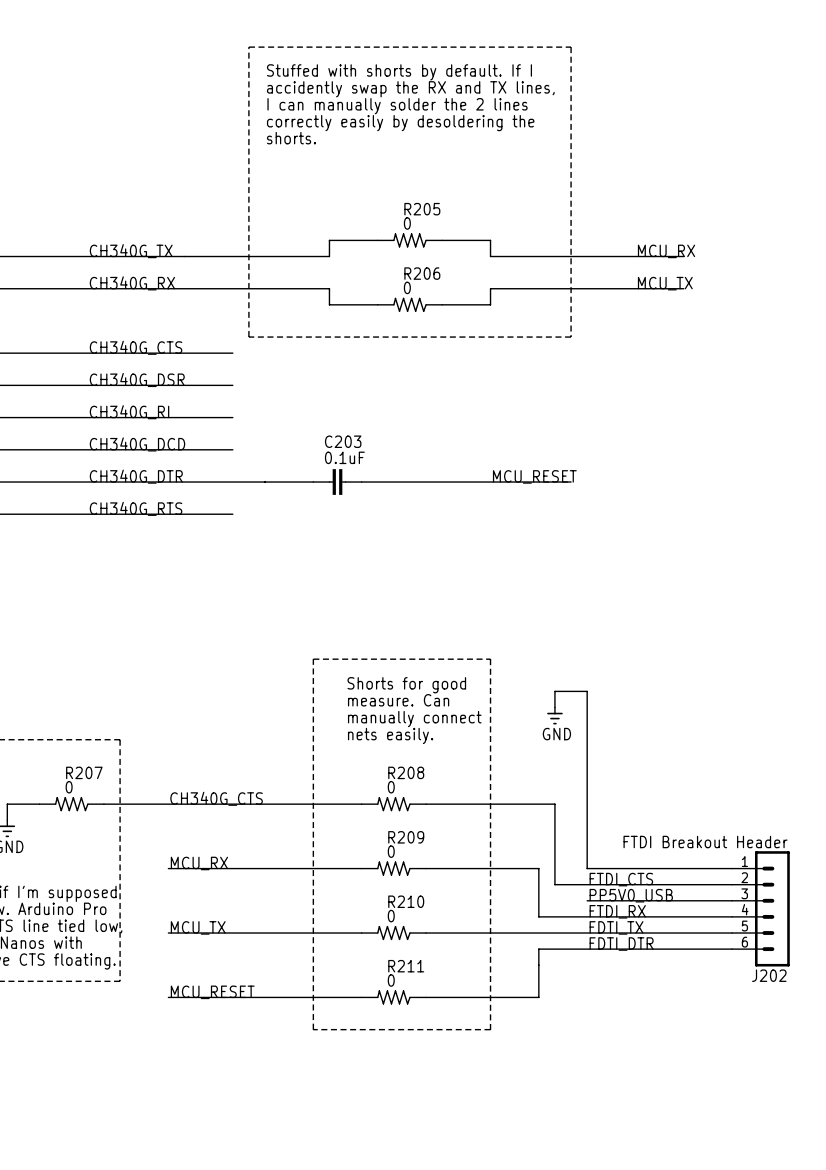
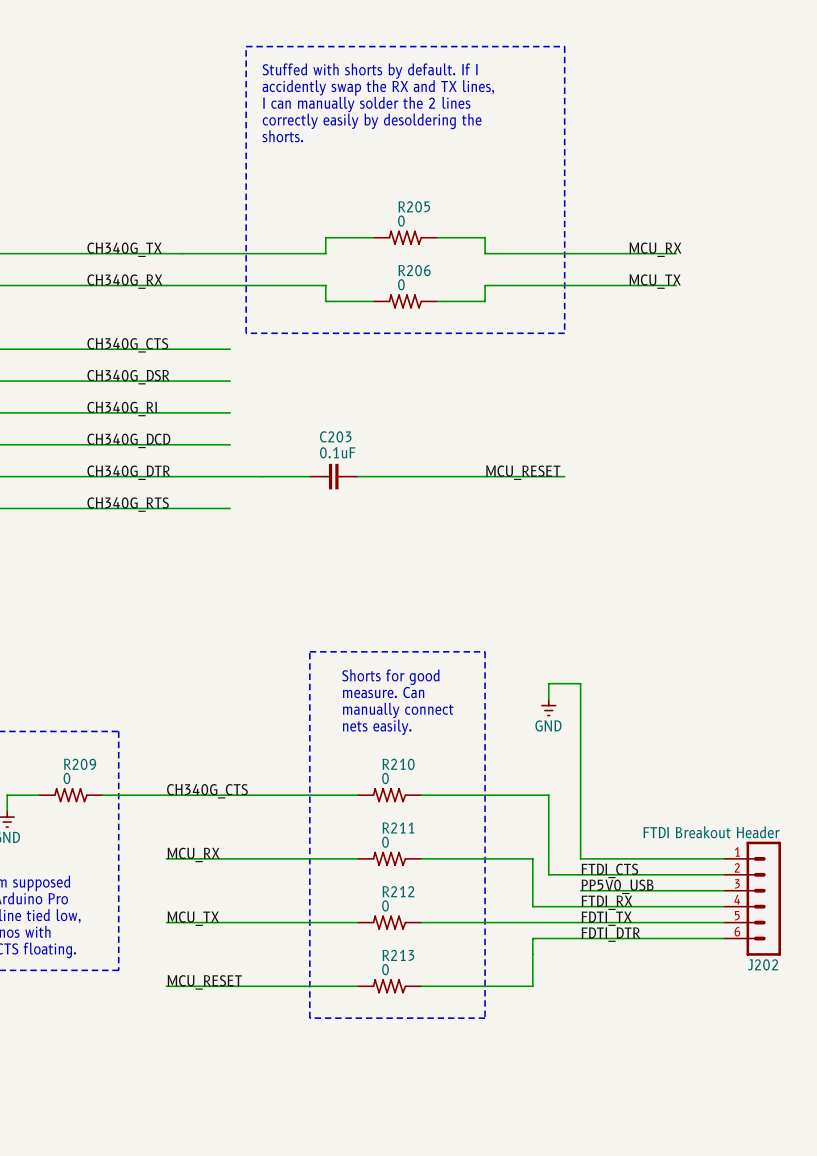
R207 name: R207 (84, 772) -> R209 (80, 764)
R208 name: R208 (406, 772) -> R210 (398, 764)
R209 name: R209 (406, 837) -> R211 (398, 827)
R210 name: R210 (406, 901) -> R212 (398, 891)
R211 name: R211 (406, 966) -> R213 (398, 955)

